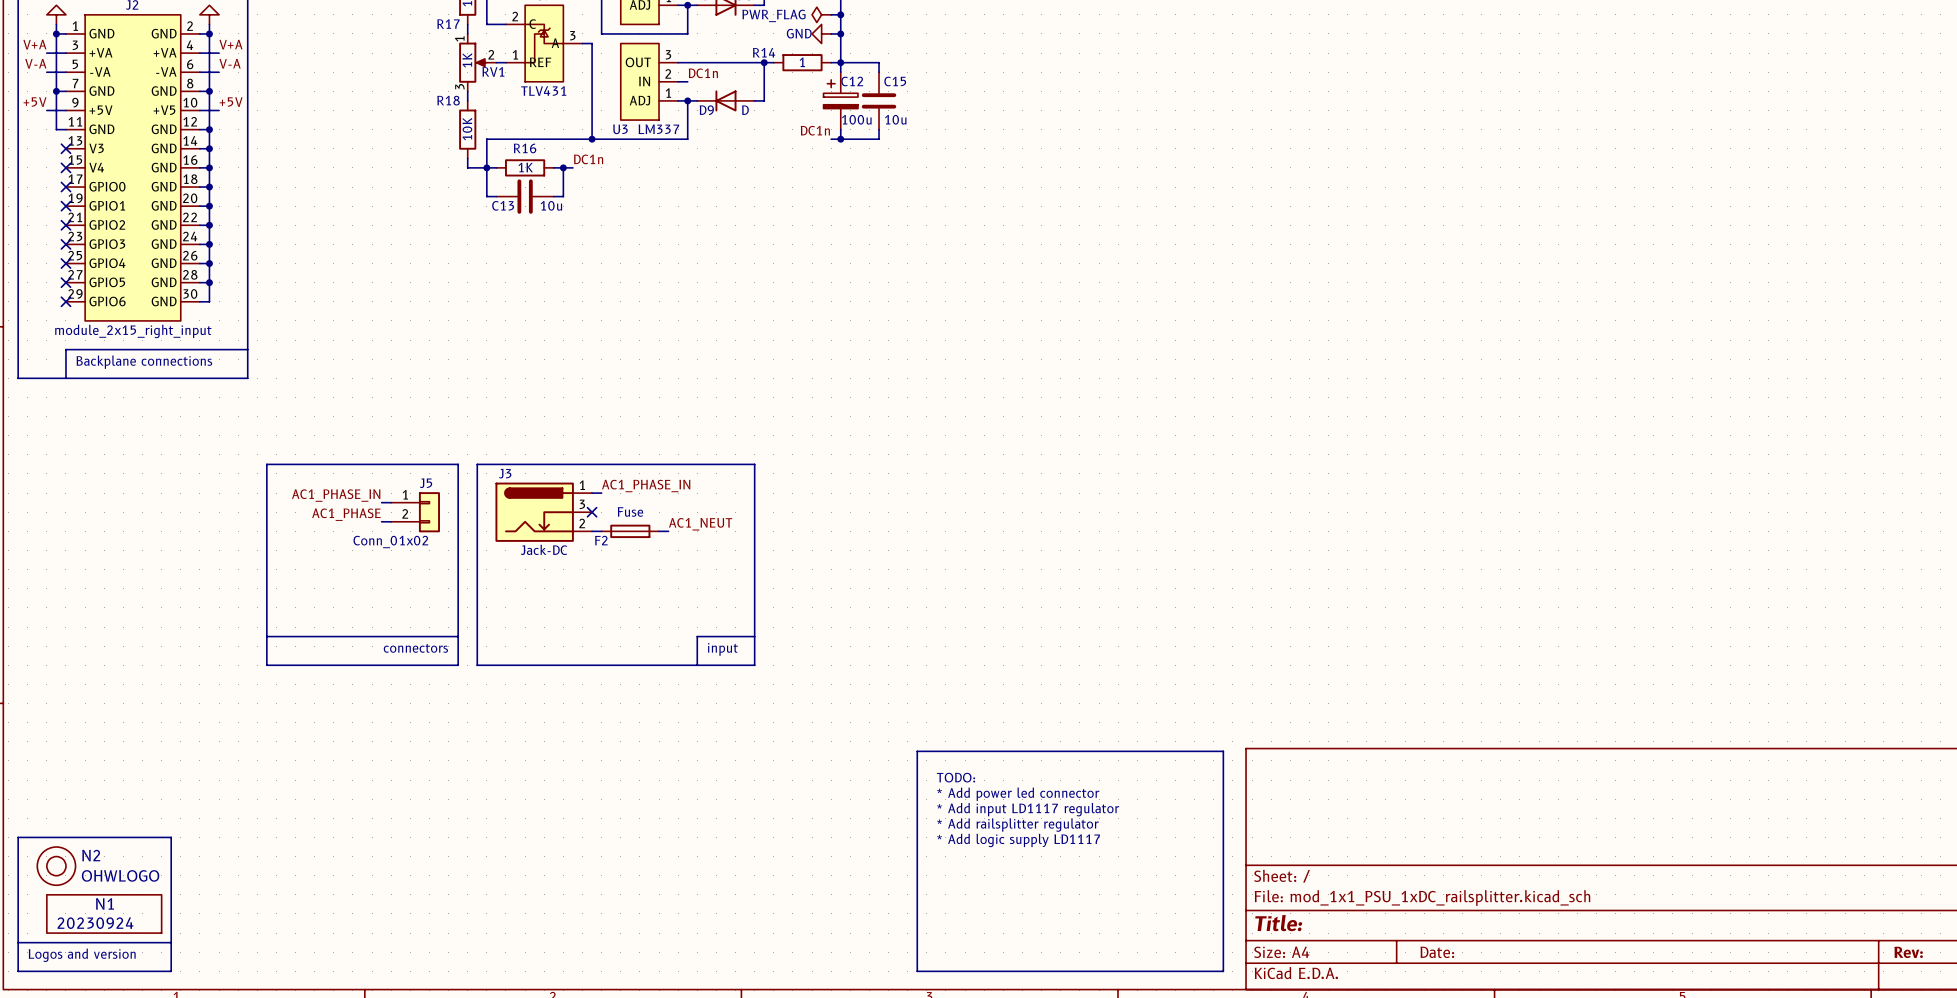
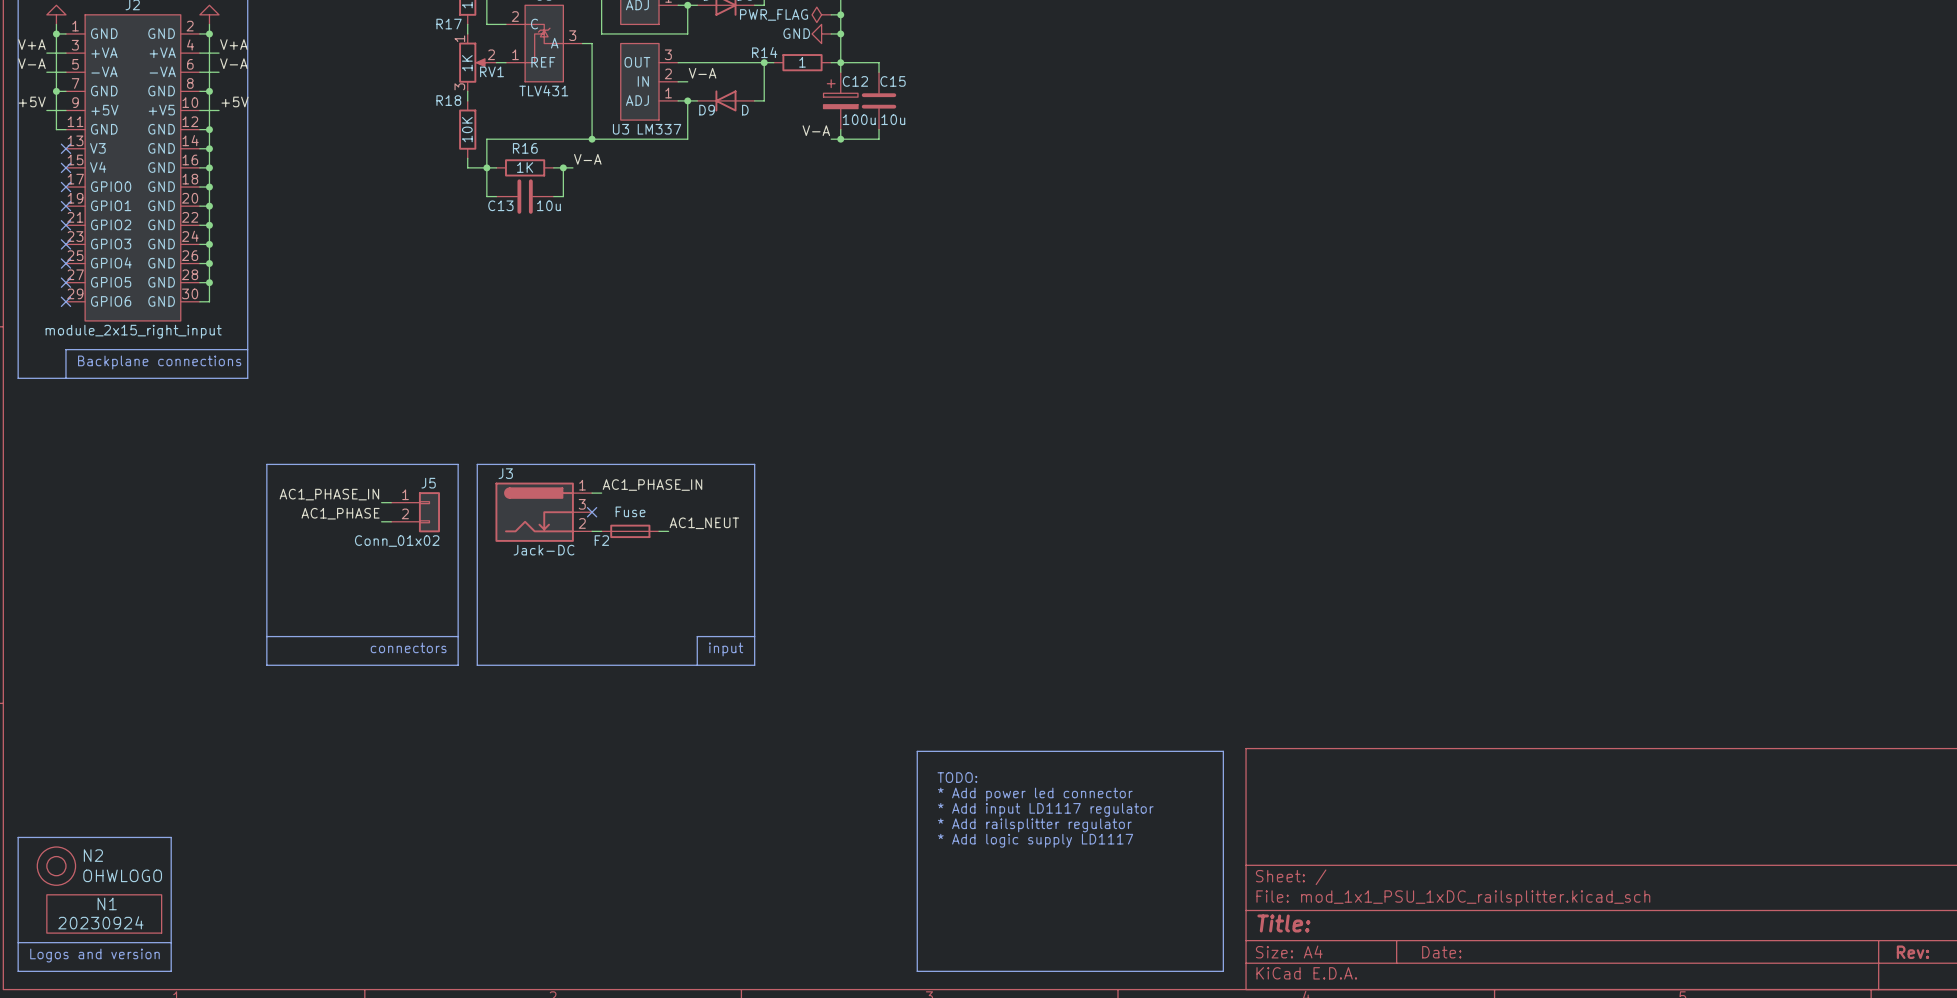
label: DC1n (703, 73) -> V-A (702, 73)
label: DC1n (815, 130) -> V-A (816, 130)
label: DC1n (588, 159) -> V-A (587, 159)

